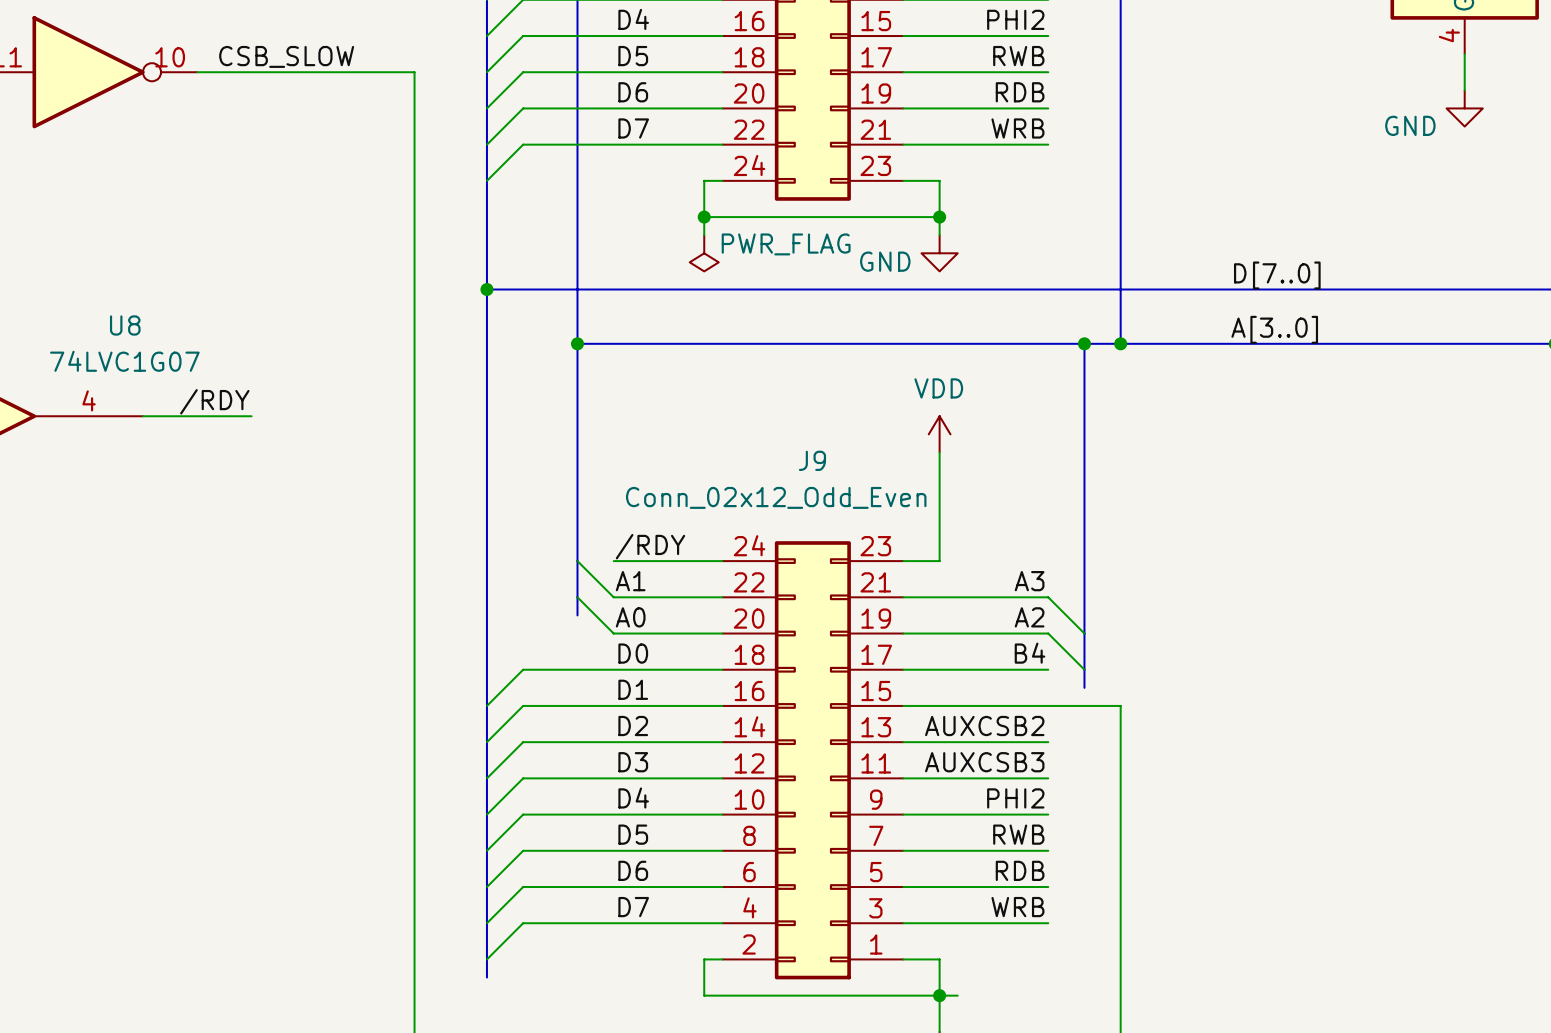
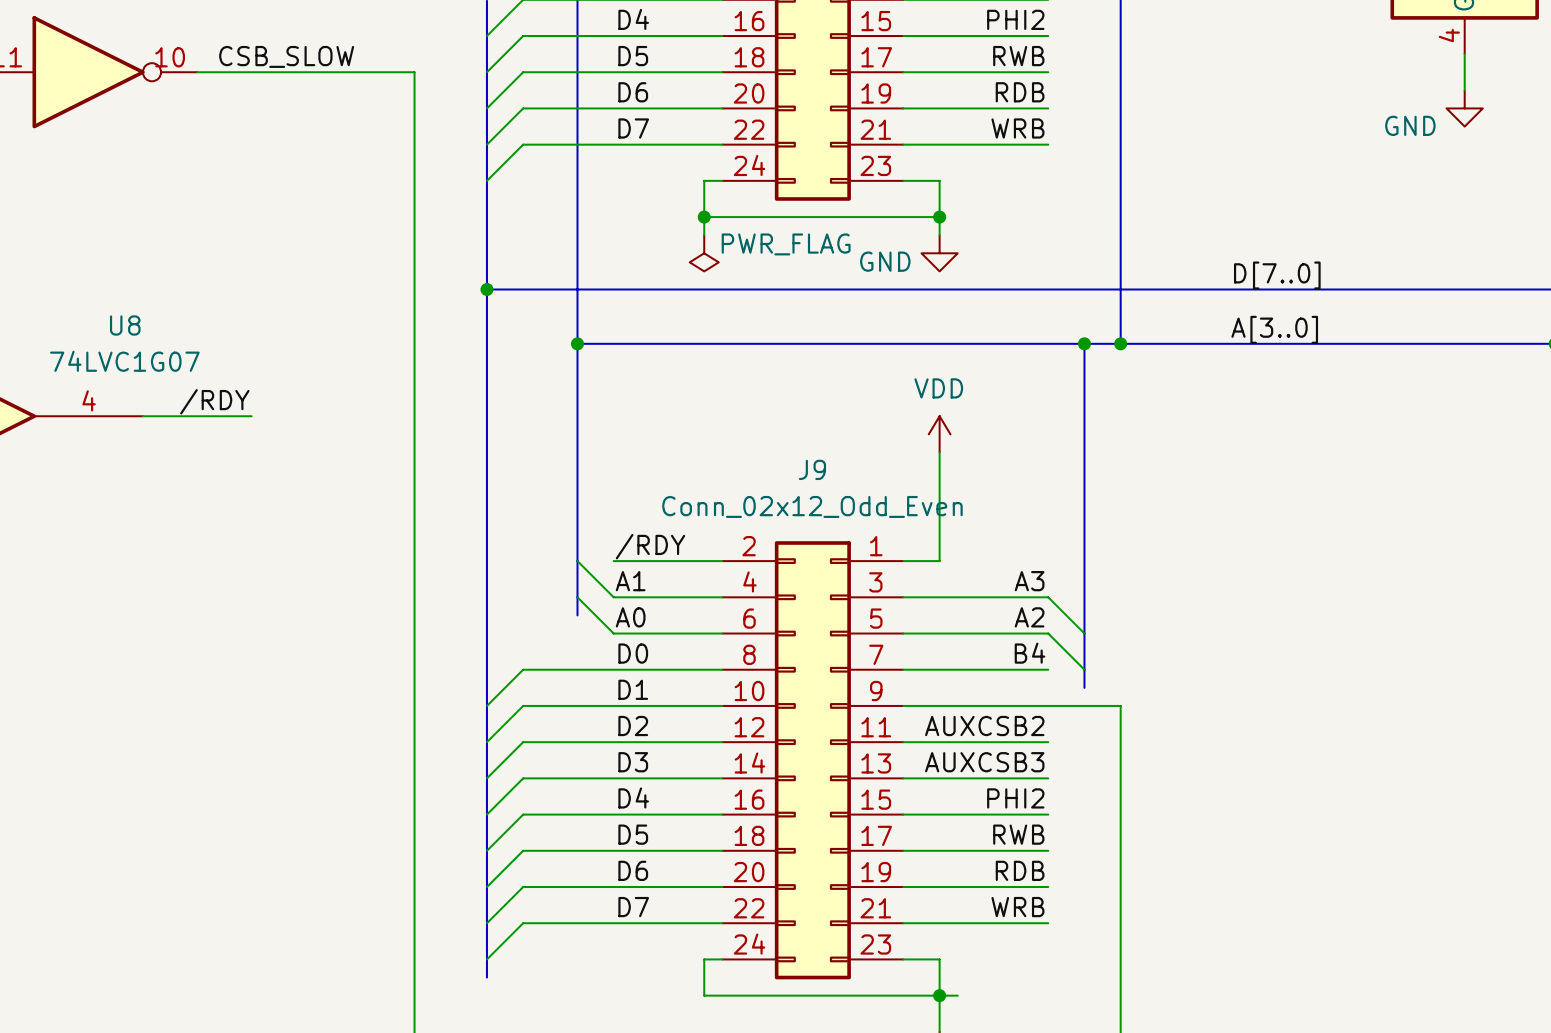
J9 value position: Conn_02x12_Odd_Even (776, 497) -> Conn_02x12_Odd_Even (812, 506)
J9 flip: as is (812, 760) -> up-down (812, 760)

